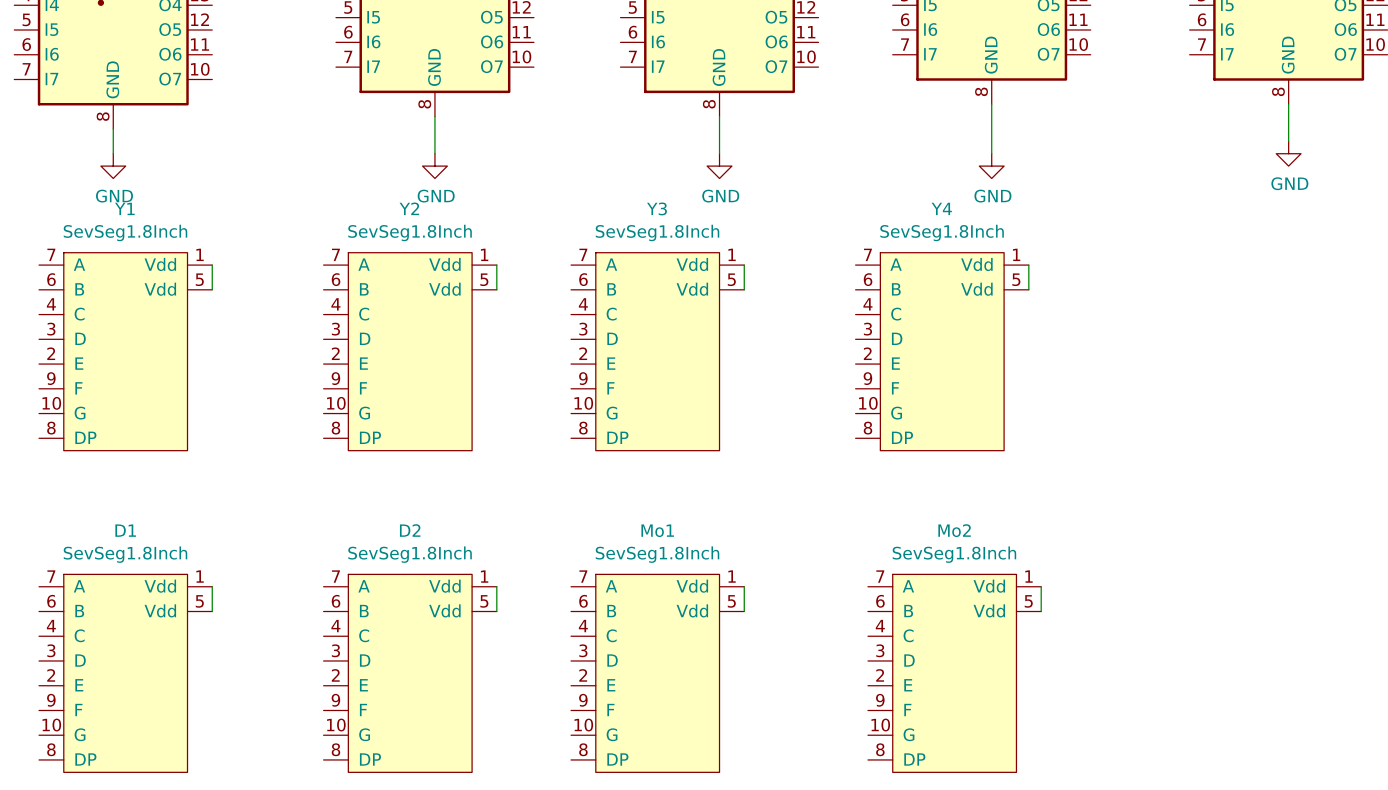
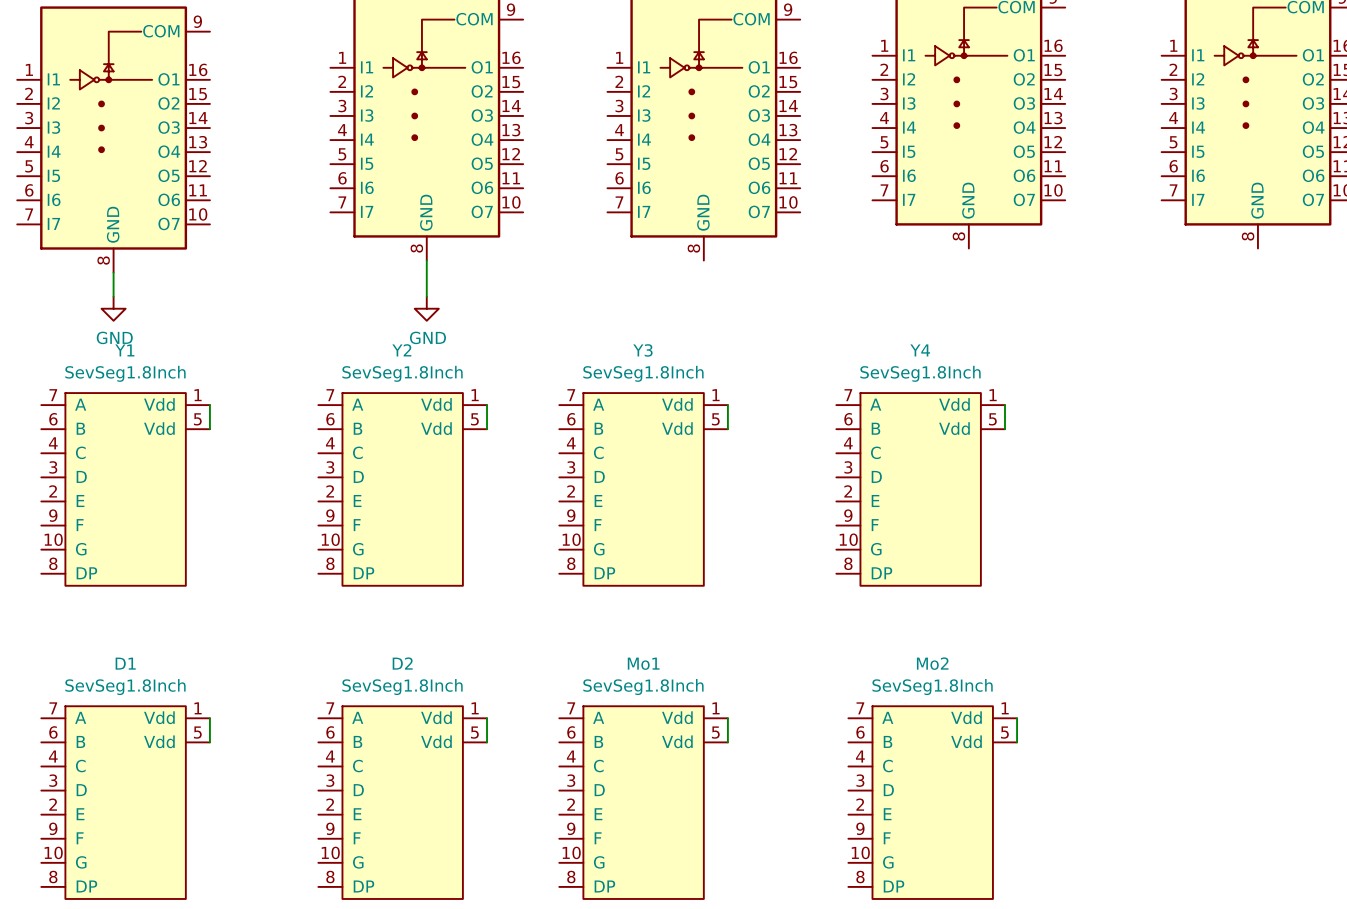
wire: (991, 104) (991, 153) -> none
wire: (1288, 104) (1288, 141) -> none
wire: (719, 116) (719, 153) -> none
power symbol: GND (1288, 153) -> none
power symbol: GND (719, 166) -> none
power symbol: GND (991, 166) -> none

